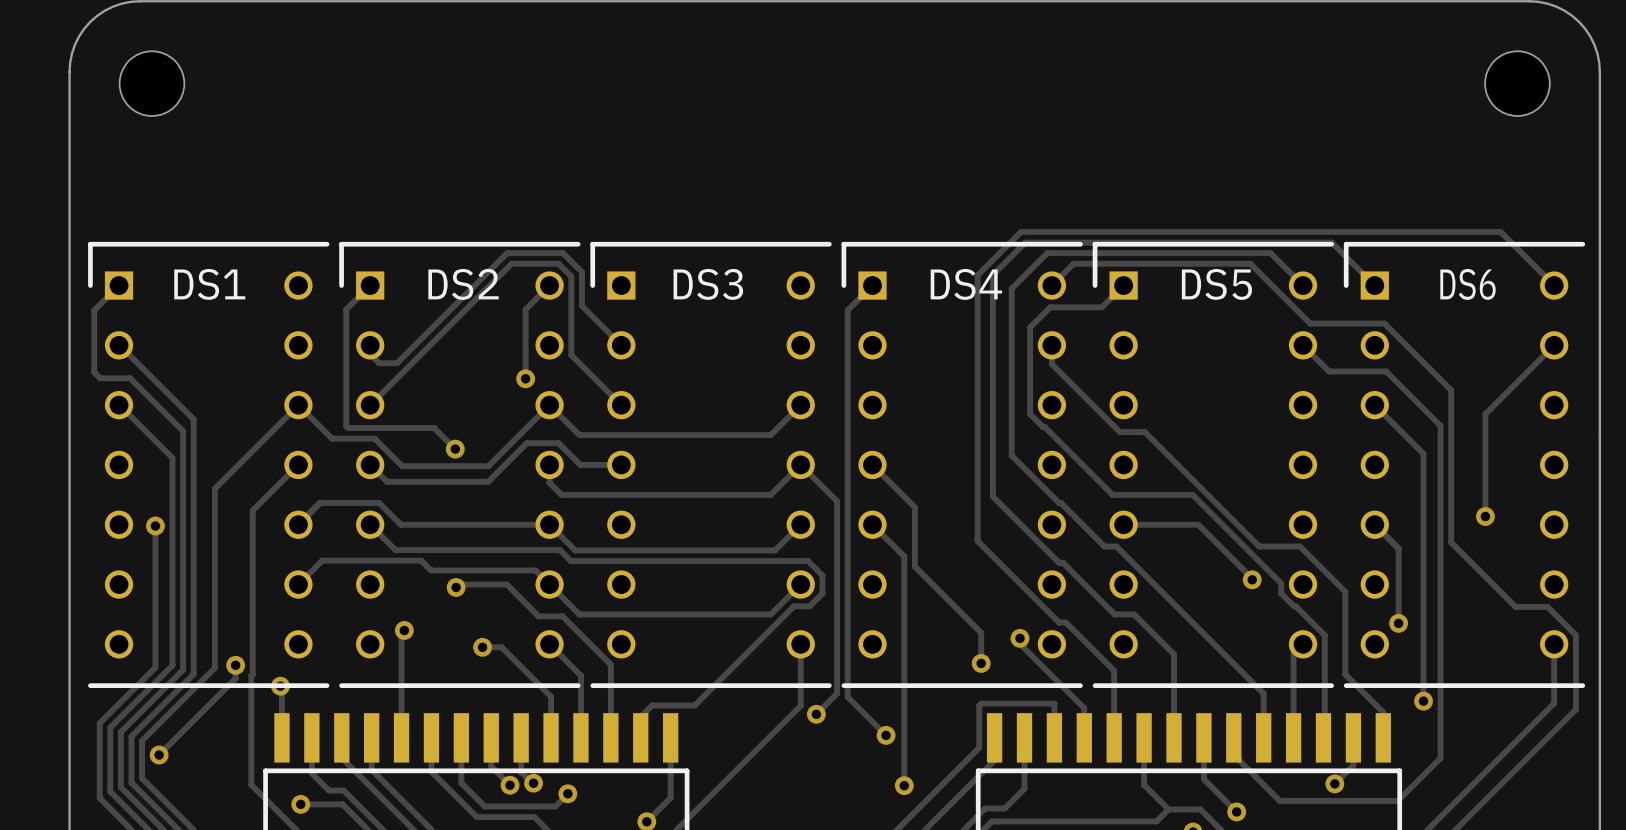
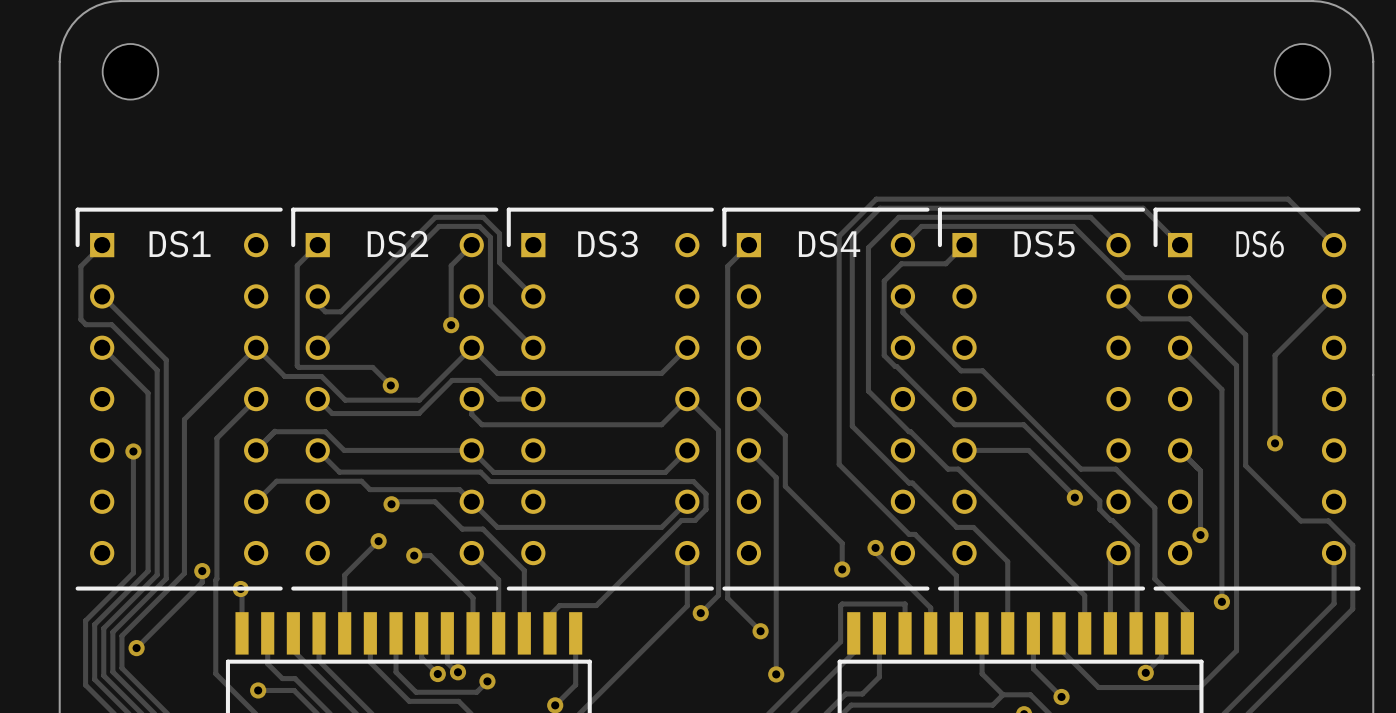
track: (404, 630) (401, 633) (401, 669) -> (378, 541) (344, 575)
via position: (404, 630) -> (378, 541)

